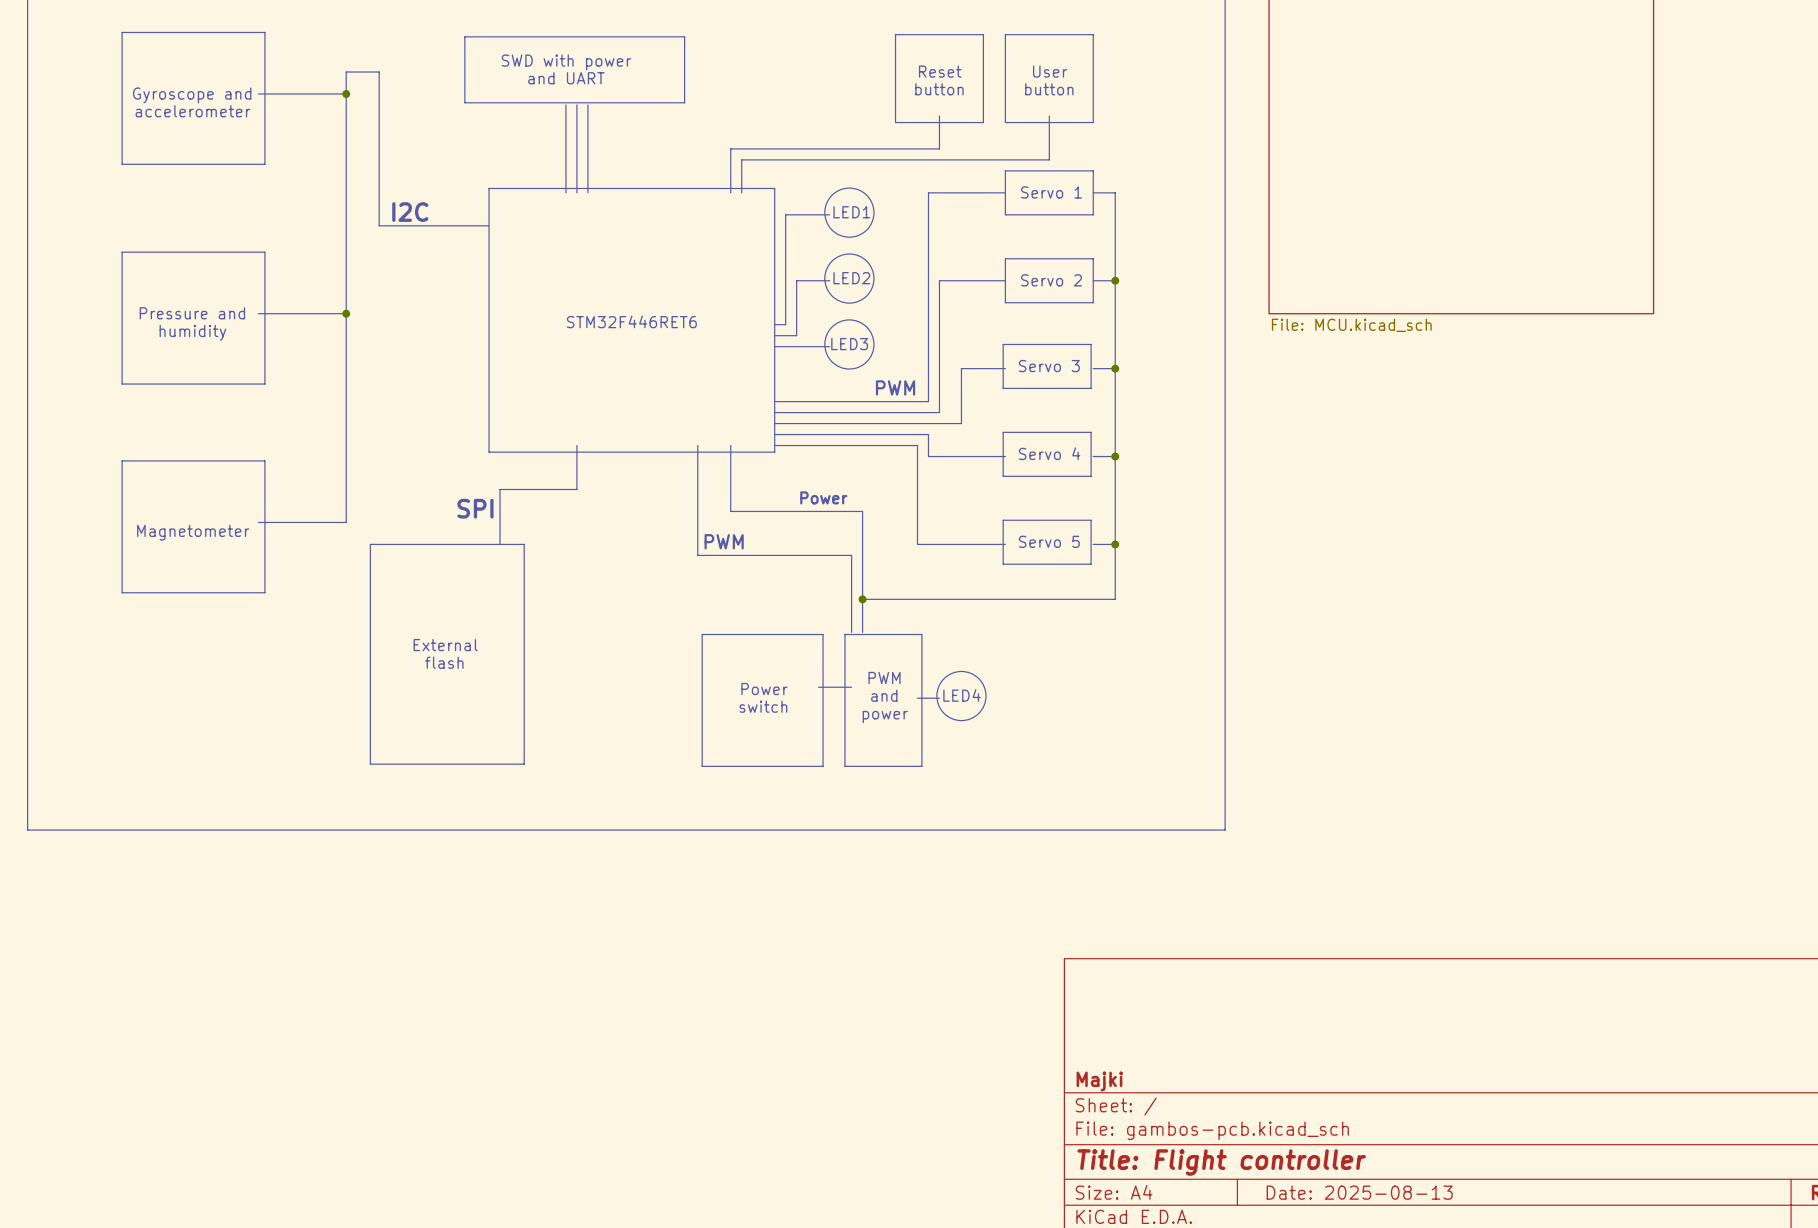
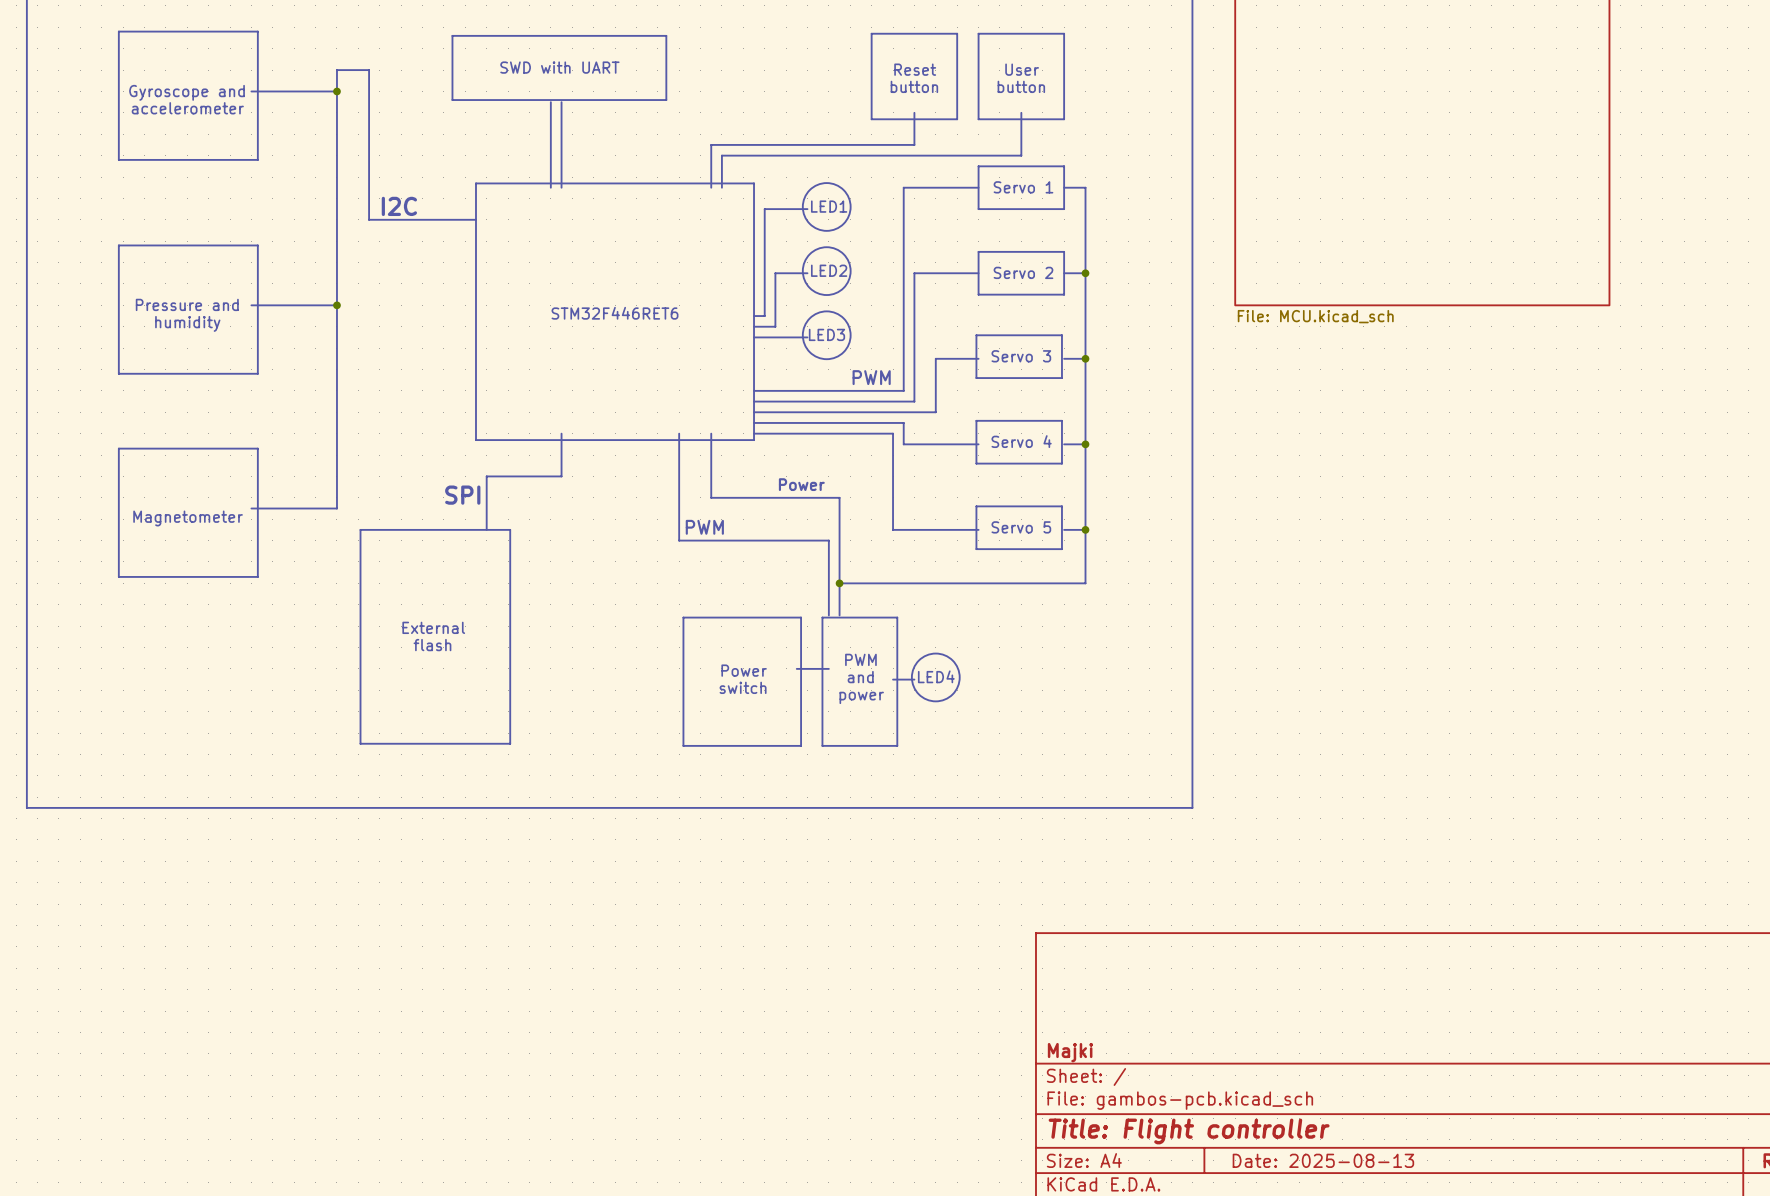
text: SWD with power (566, 62) -> SWD with UART (559, 67)
text: and UART (566, 78) -> none
bus: (587, 104) (587, 192) -> none

